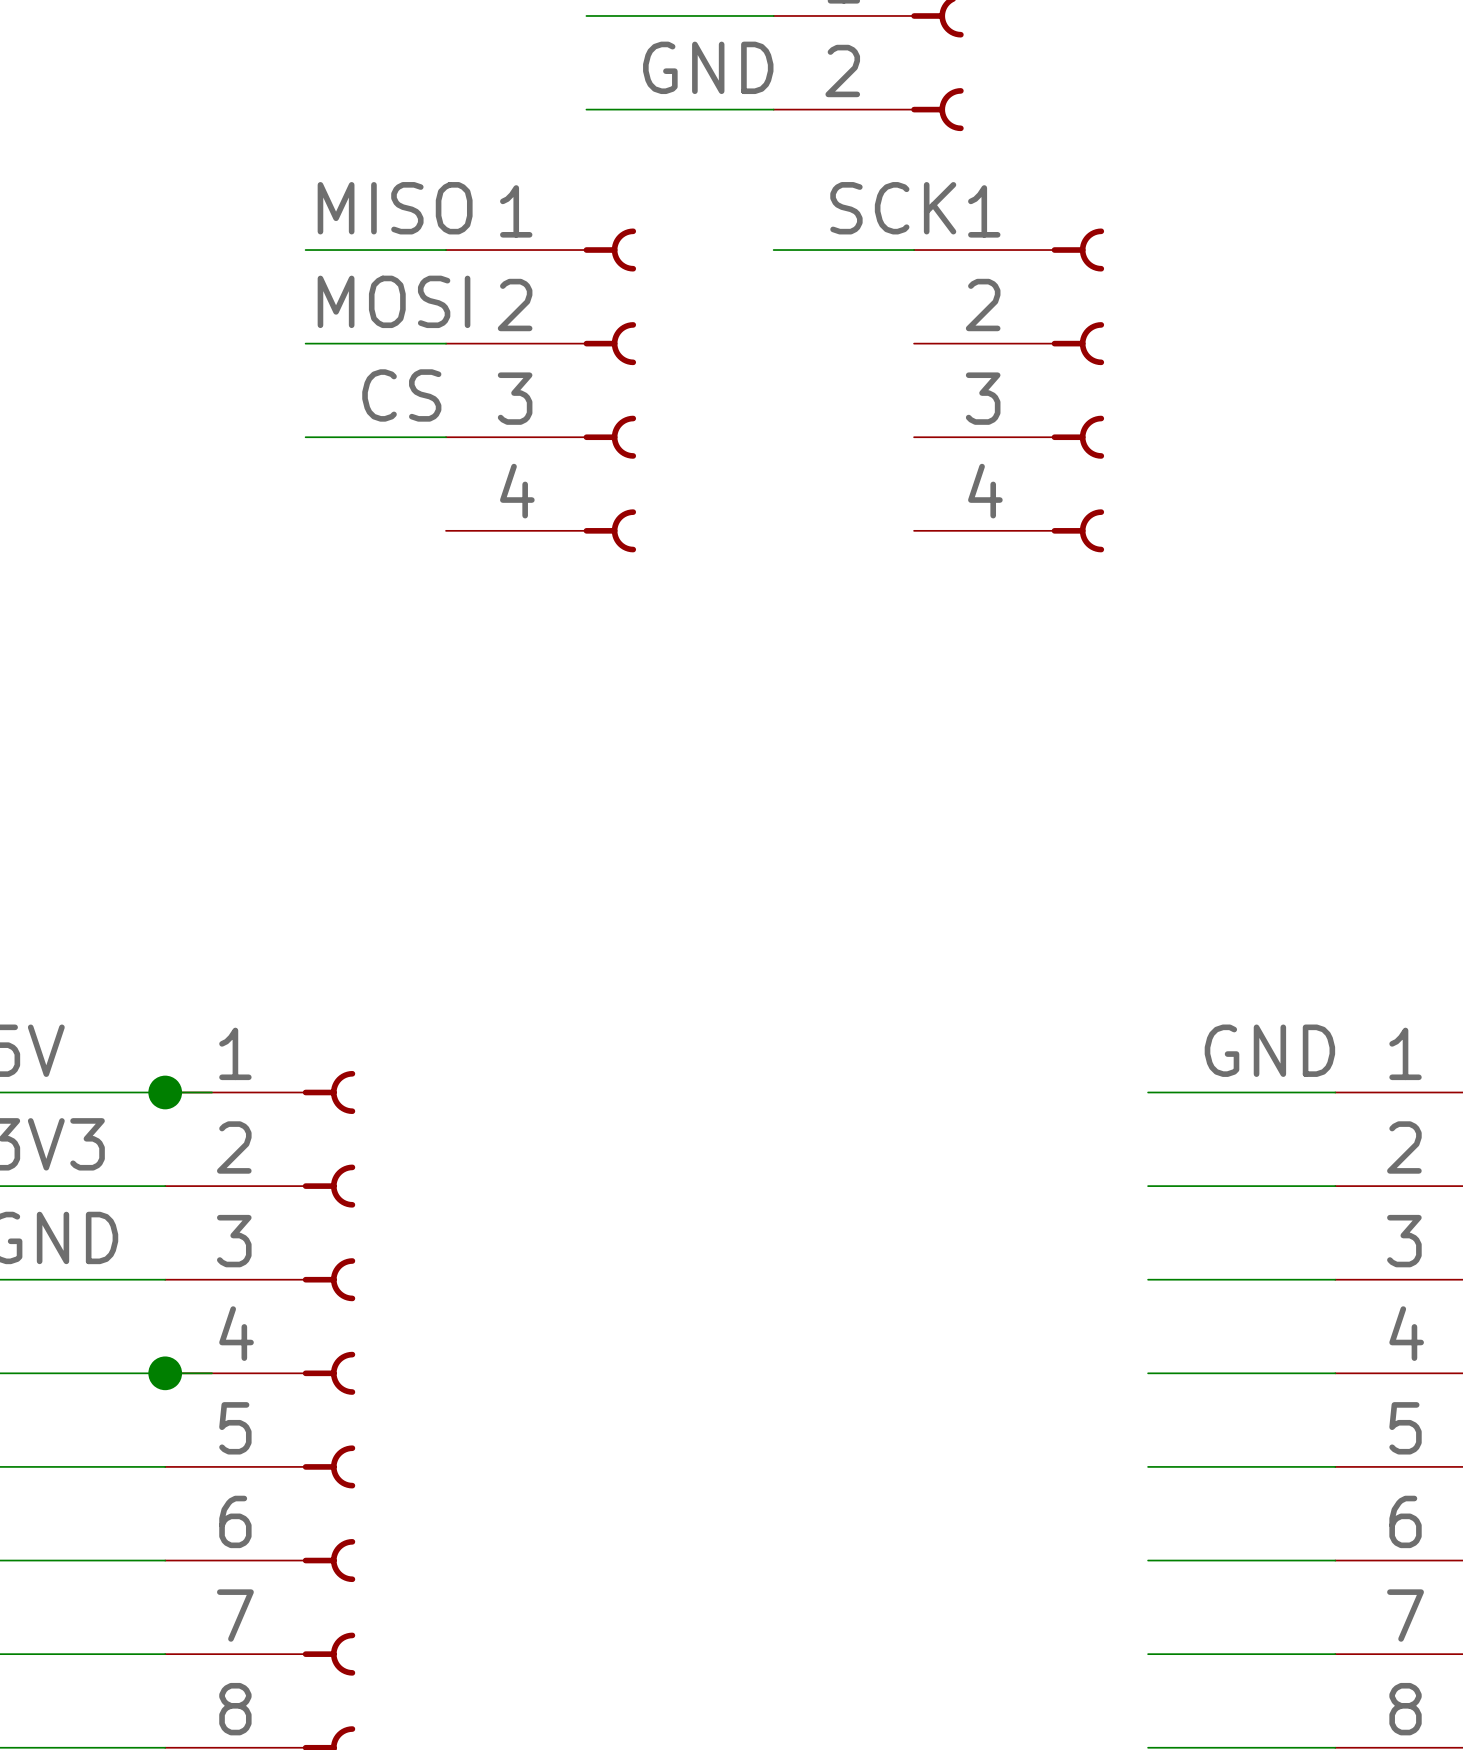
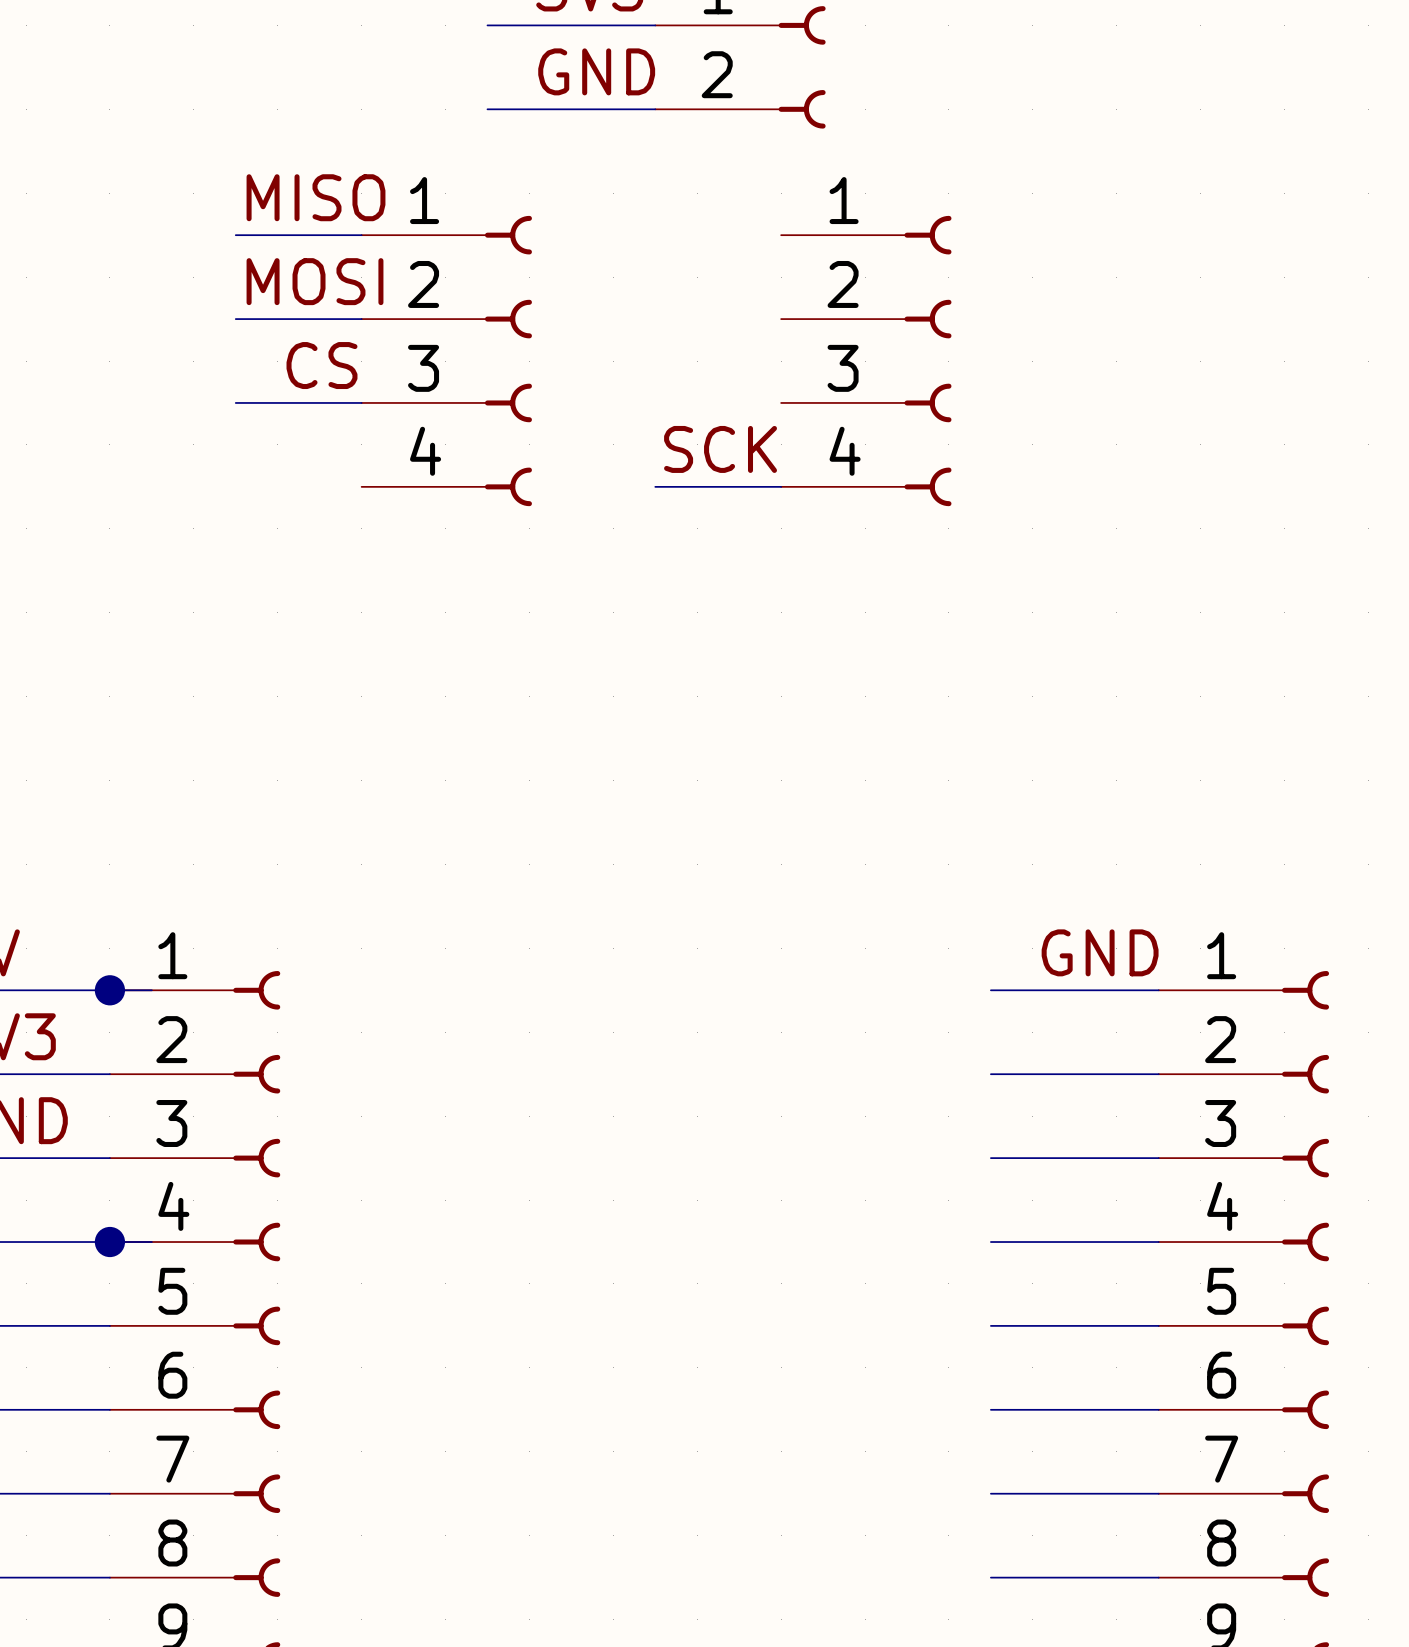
label position: SCK (893, 208) -> SCK (720, 449)
wire: (773, 250) (914, 250) -> (655, 486) (781, 486)

